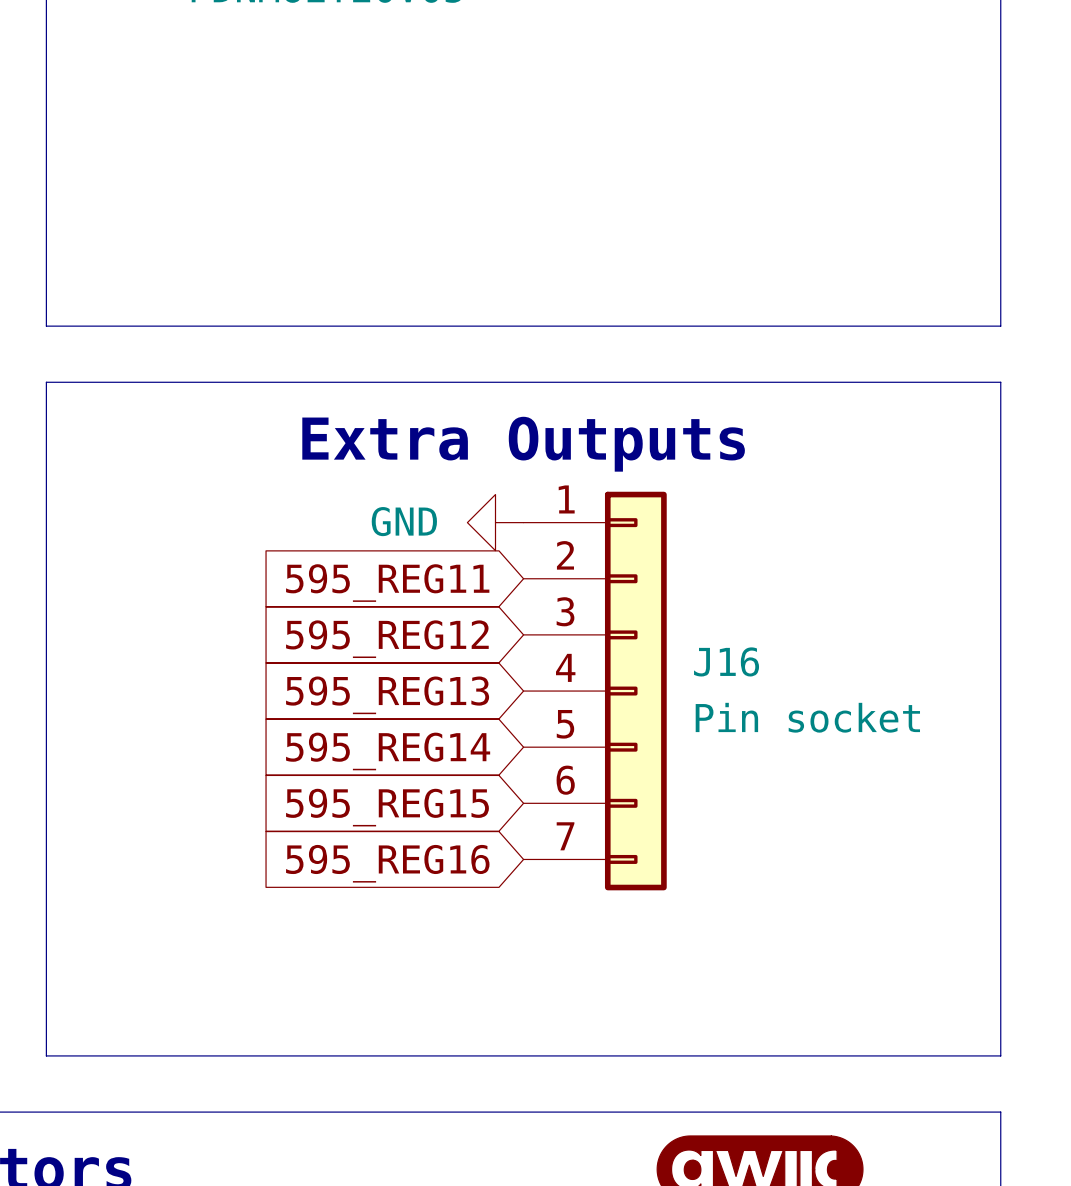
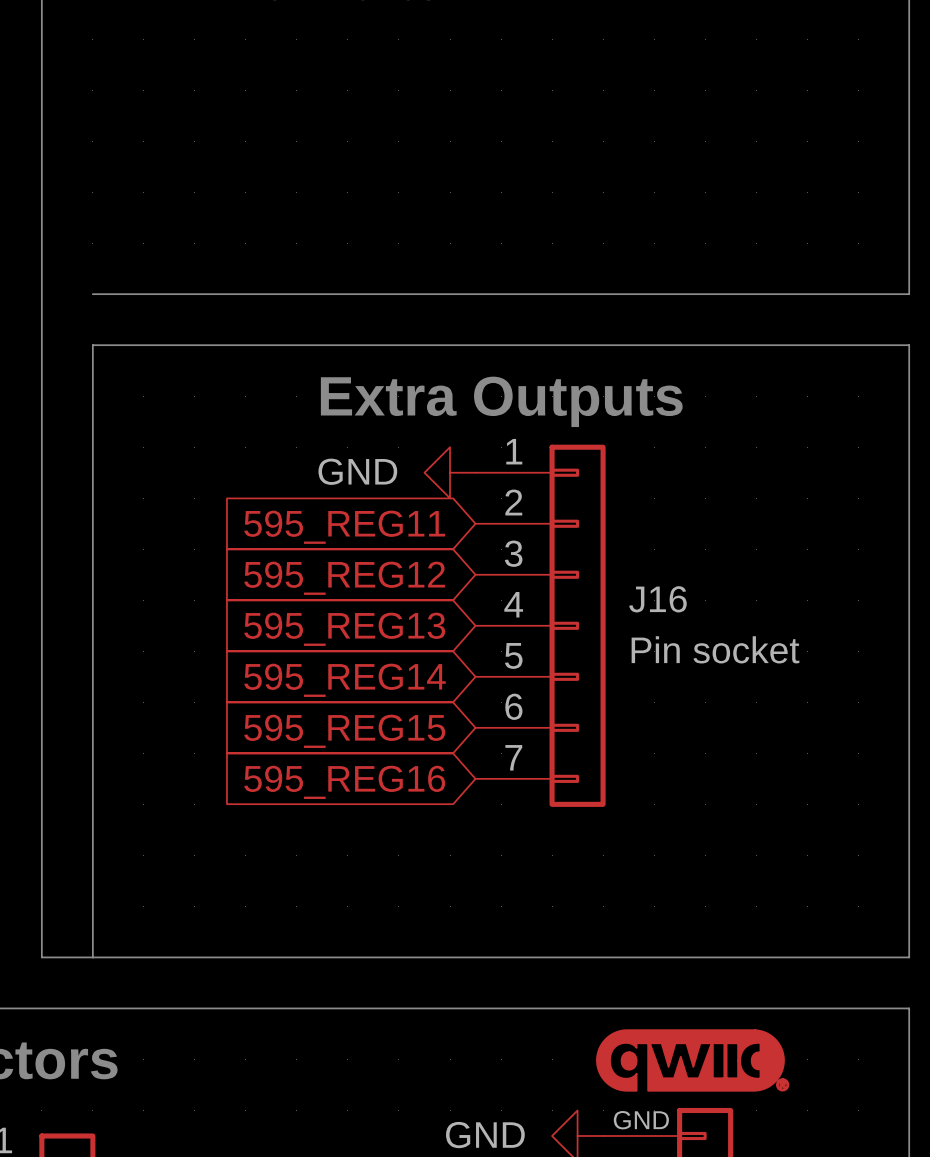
line: (46, 326) (102, 326) -> (41, 294) (41, 345)
line: (46, 382) (102, 382) -> (92, 957) (92, 345)
text position: Extra Outputs (523, 444) -> Extra Outputs (501, 401)

